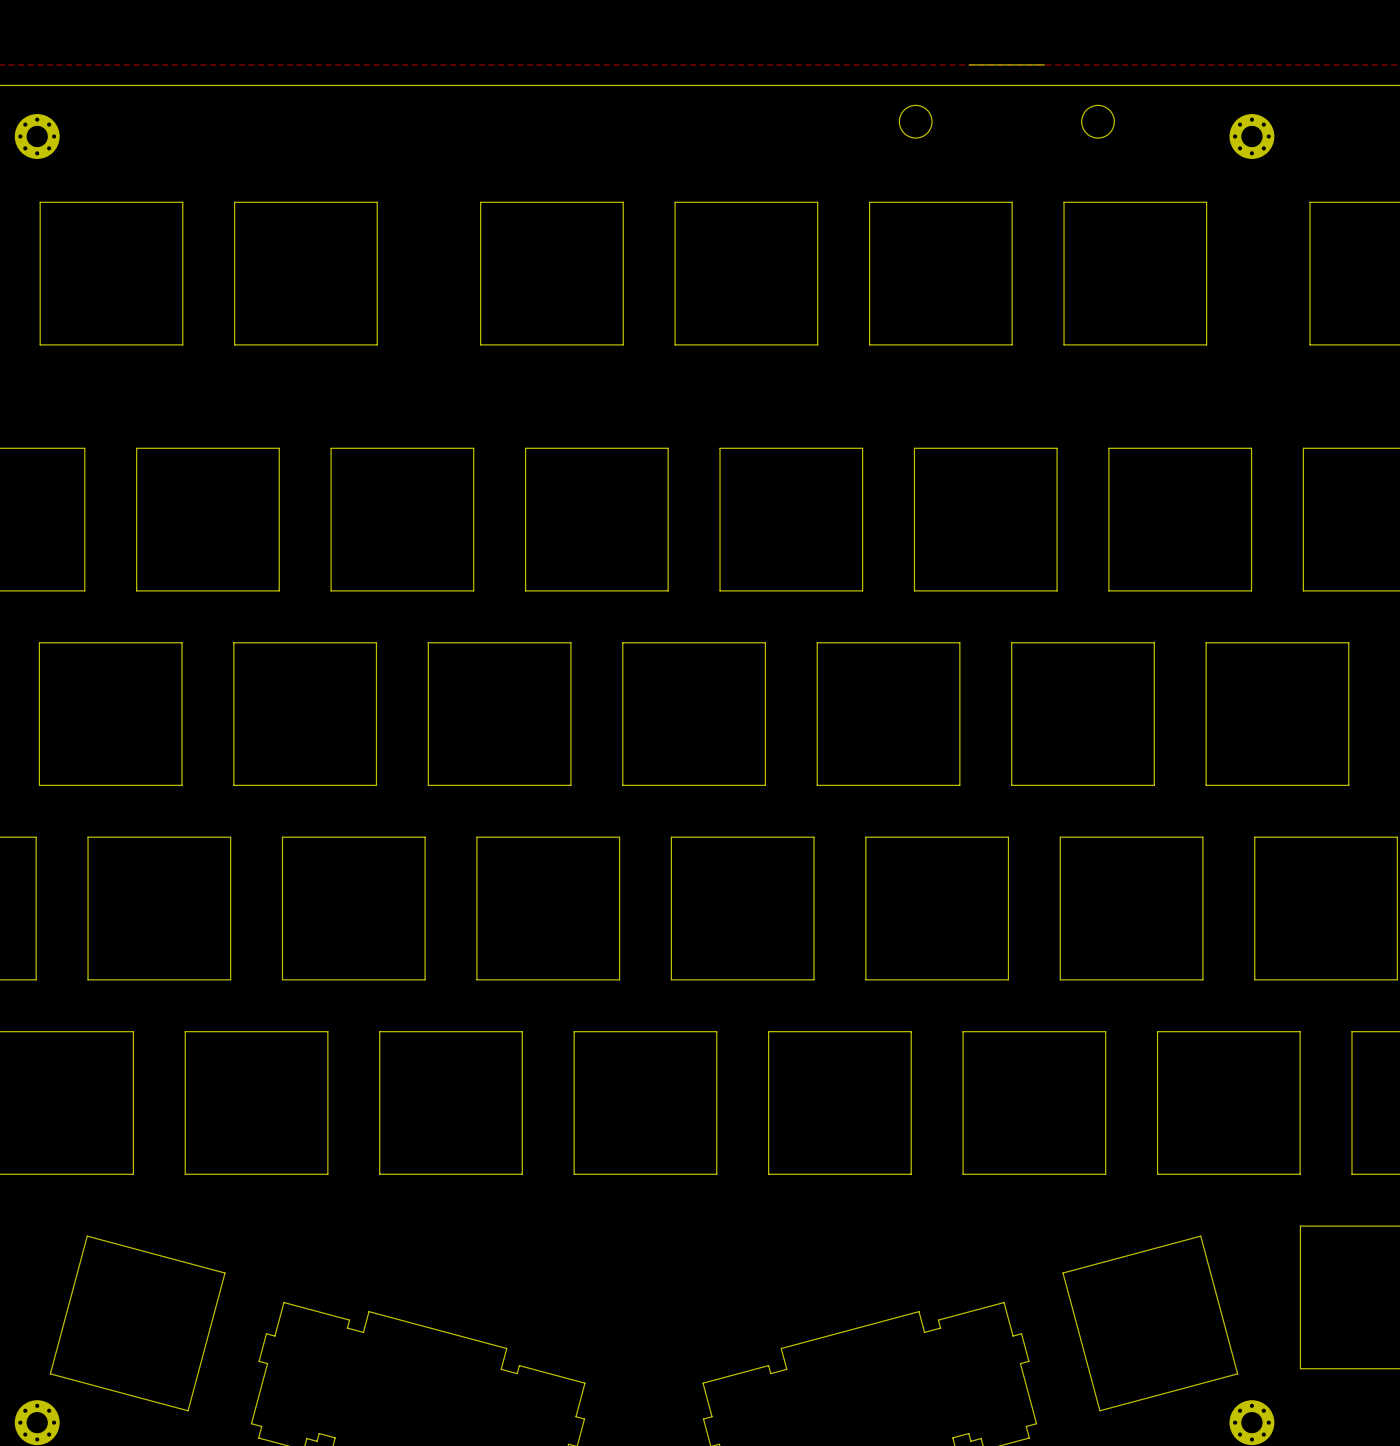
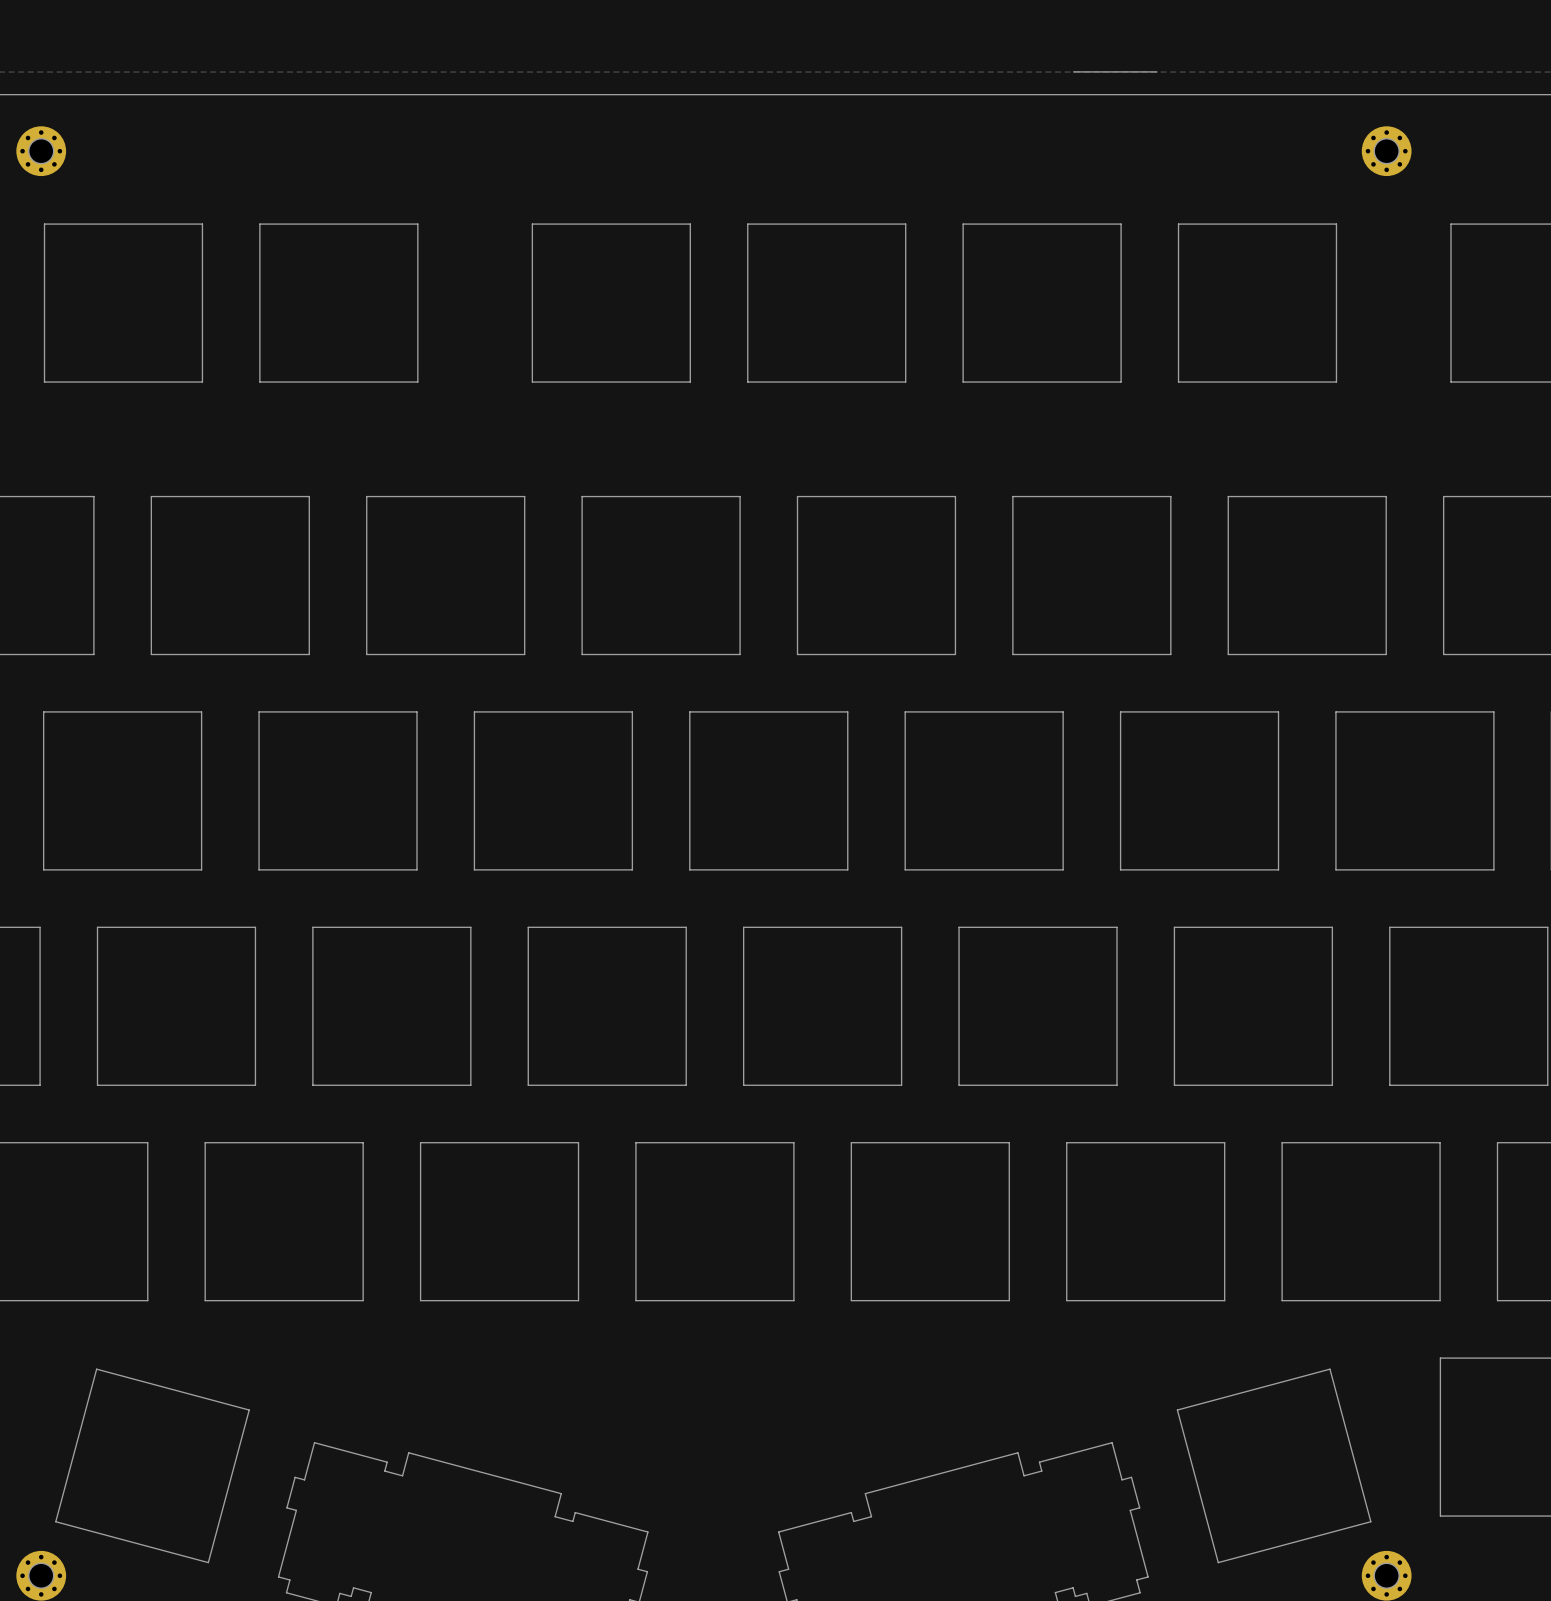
round board edge: [899, 105, 933, 139] -> none
round board edge: [1081, 105, 1115, 139] -> none

